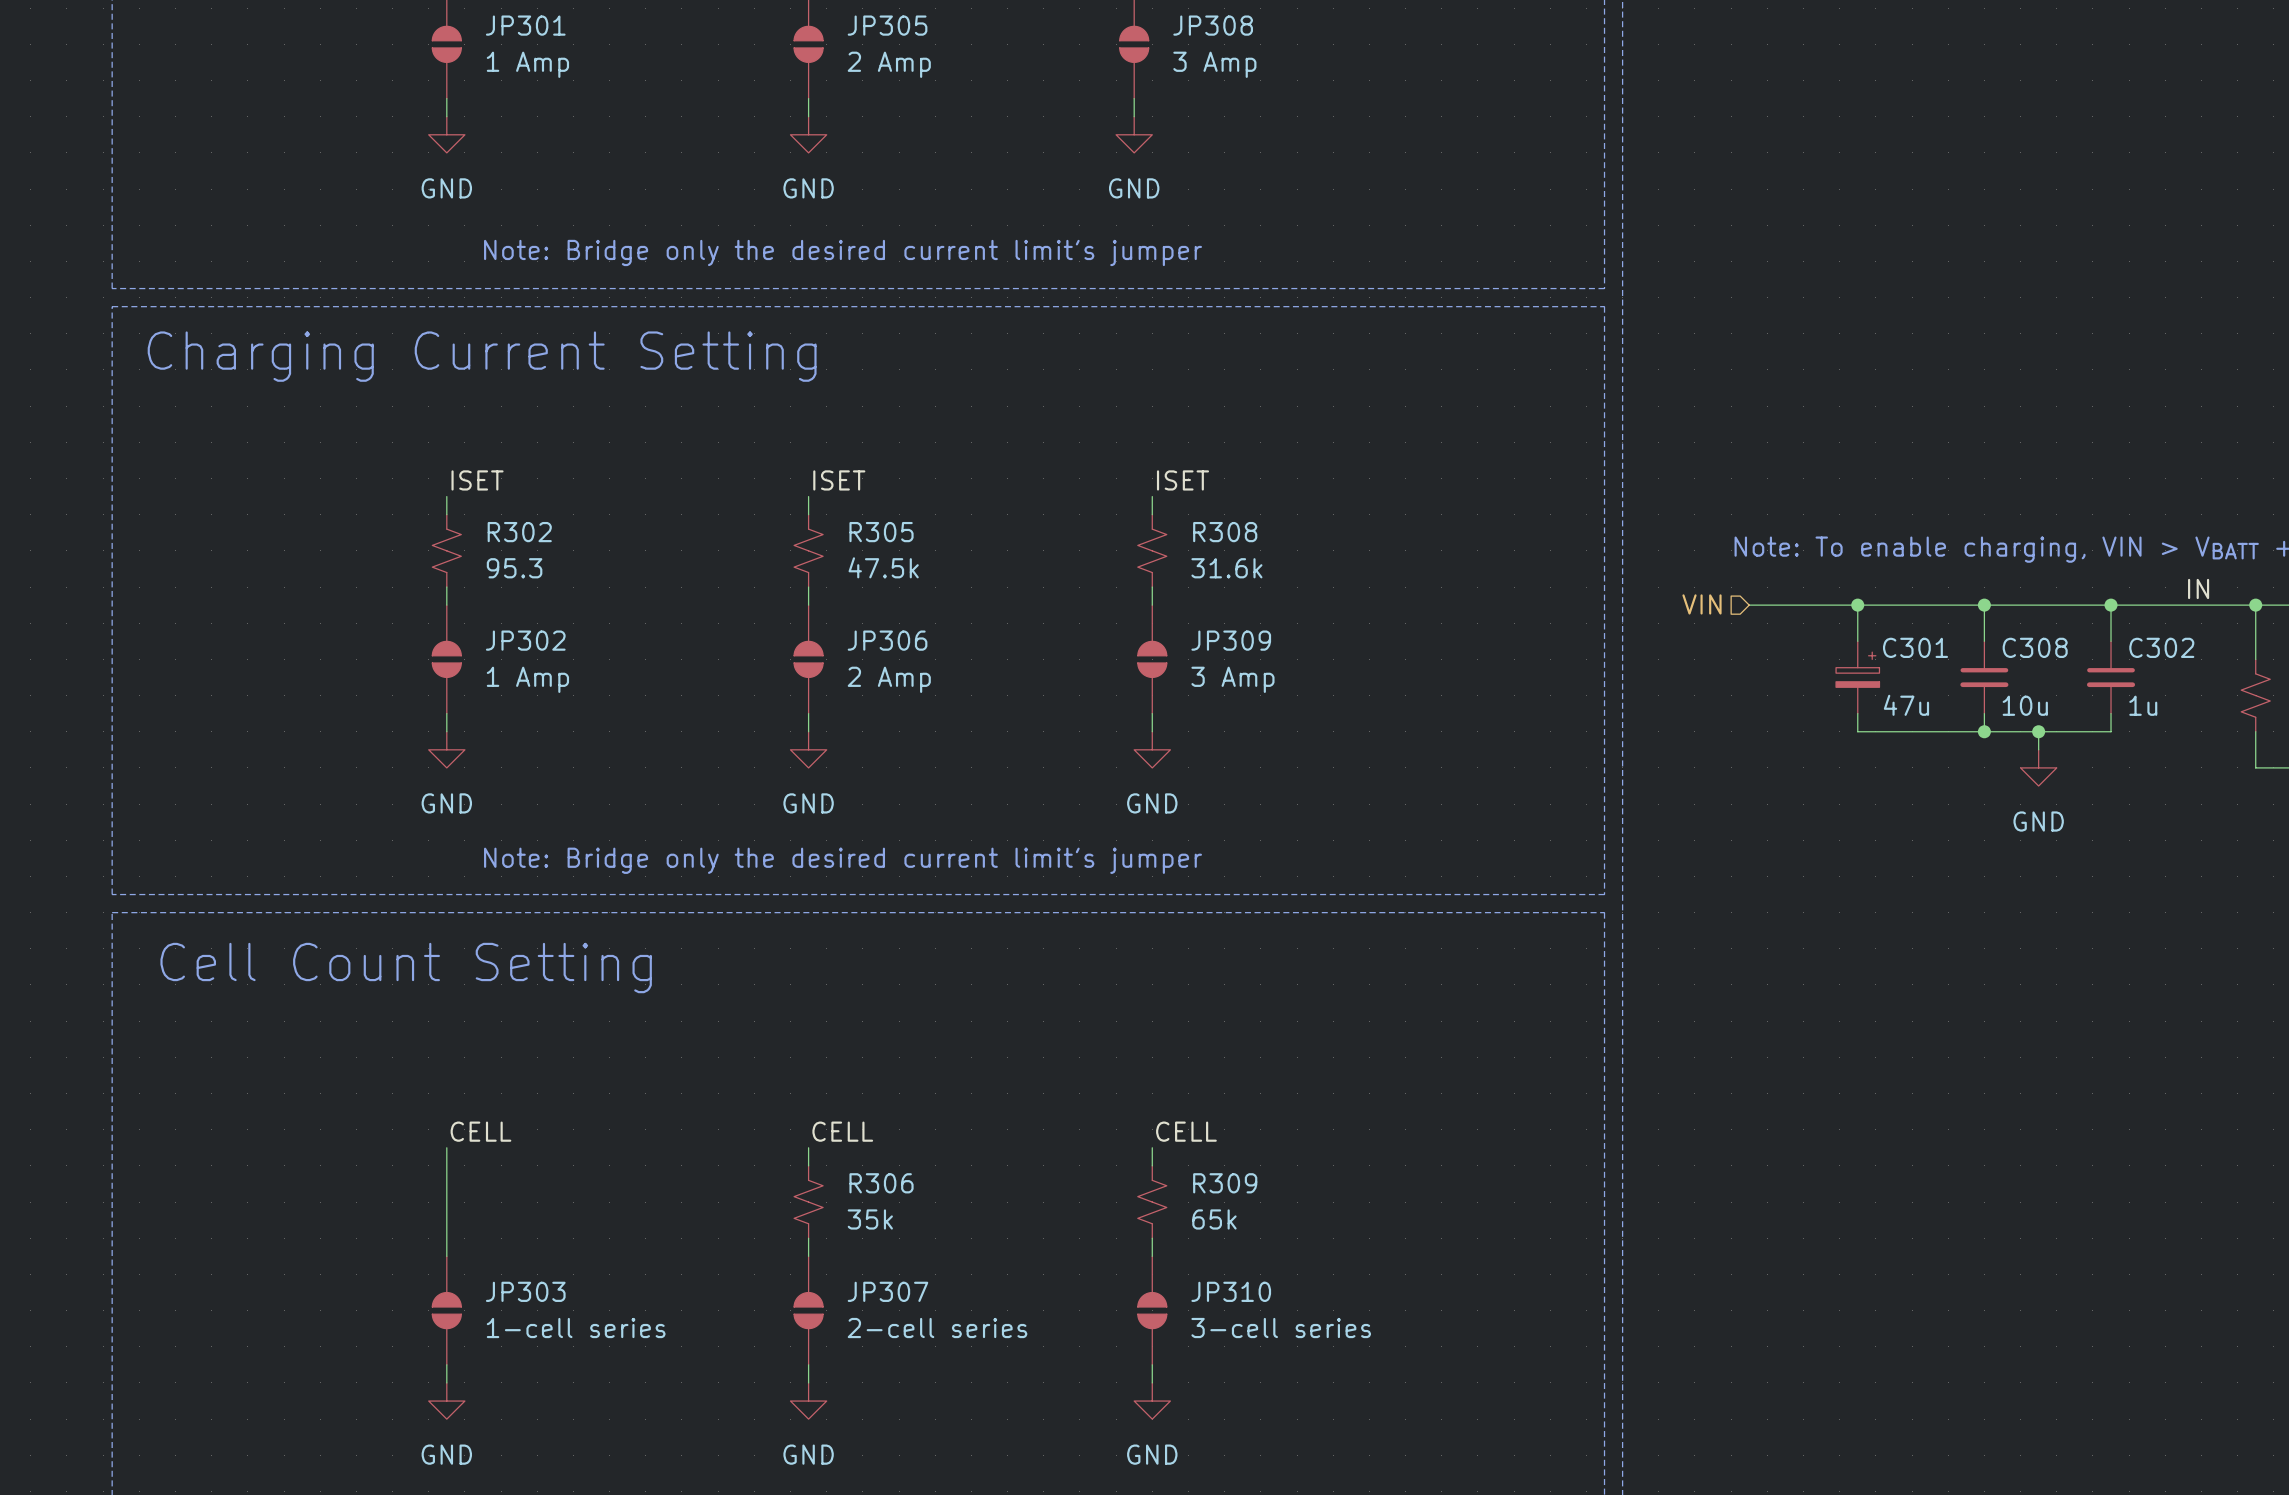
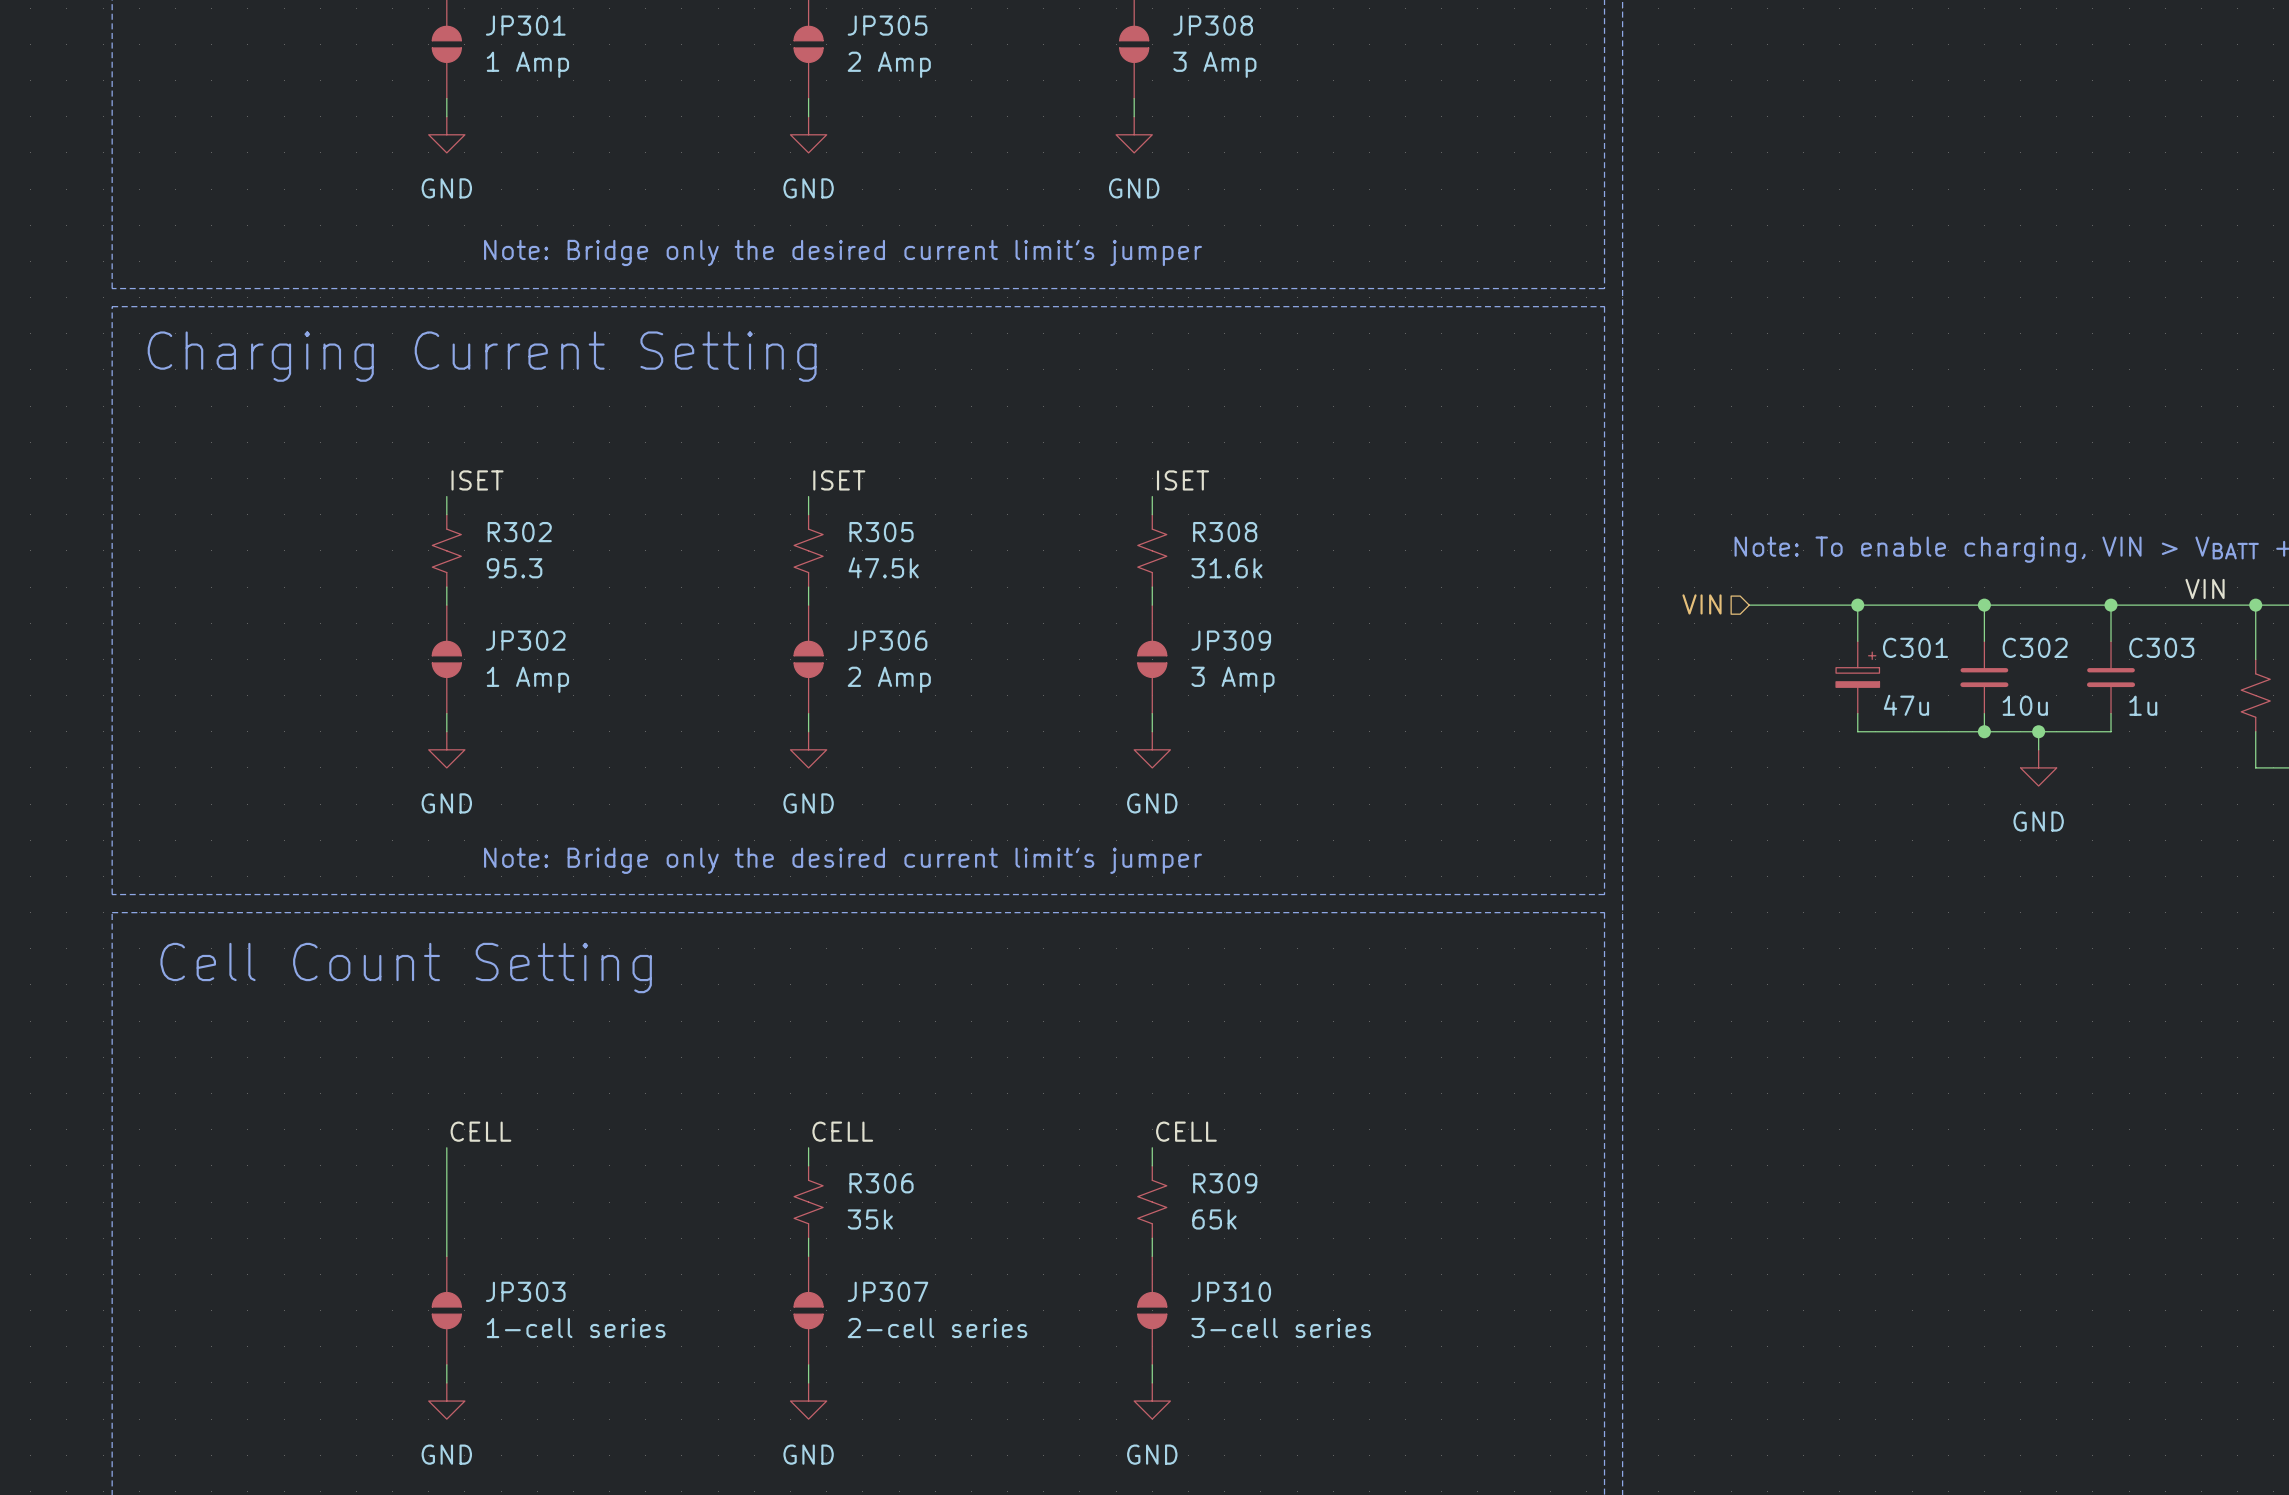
label: IN (2198, 588) -> VIN (2205, 588)
C308 name: C308 (2035, 647) -> C302 (2035, 647)
C302 name: C302 (2161, 647) -> C303 (2161, 647)

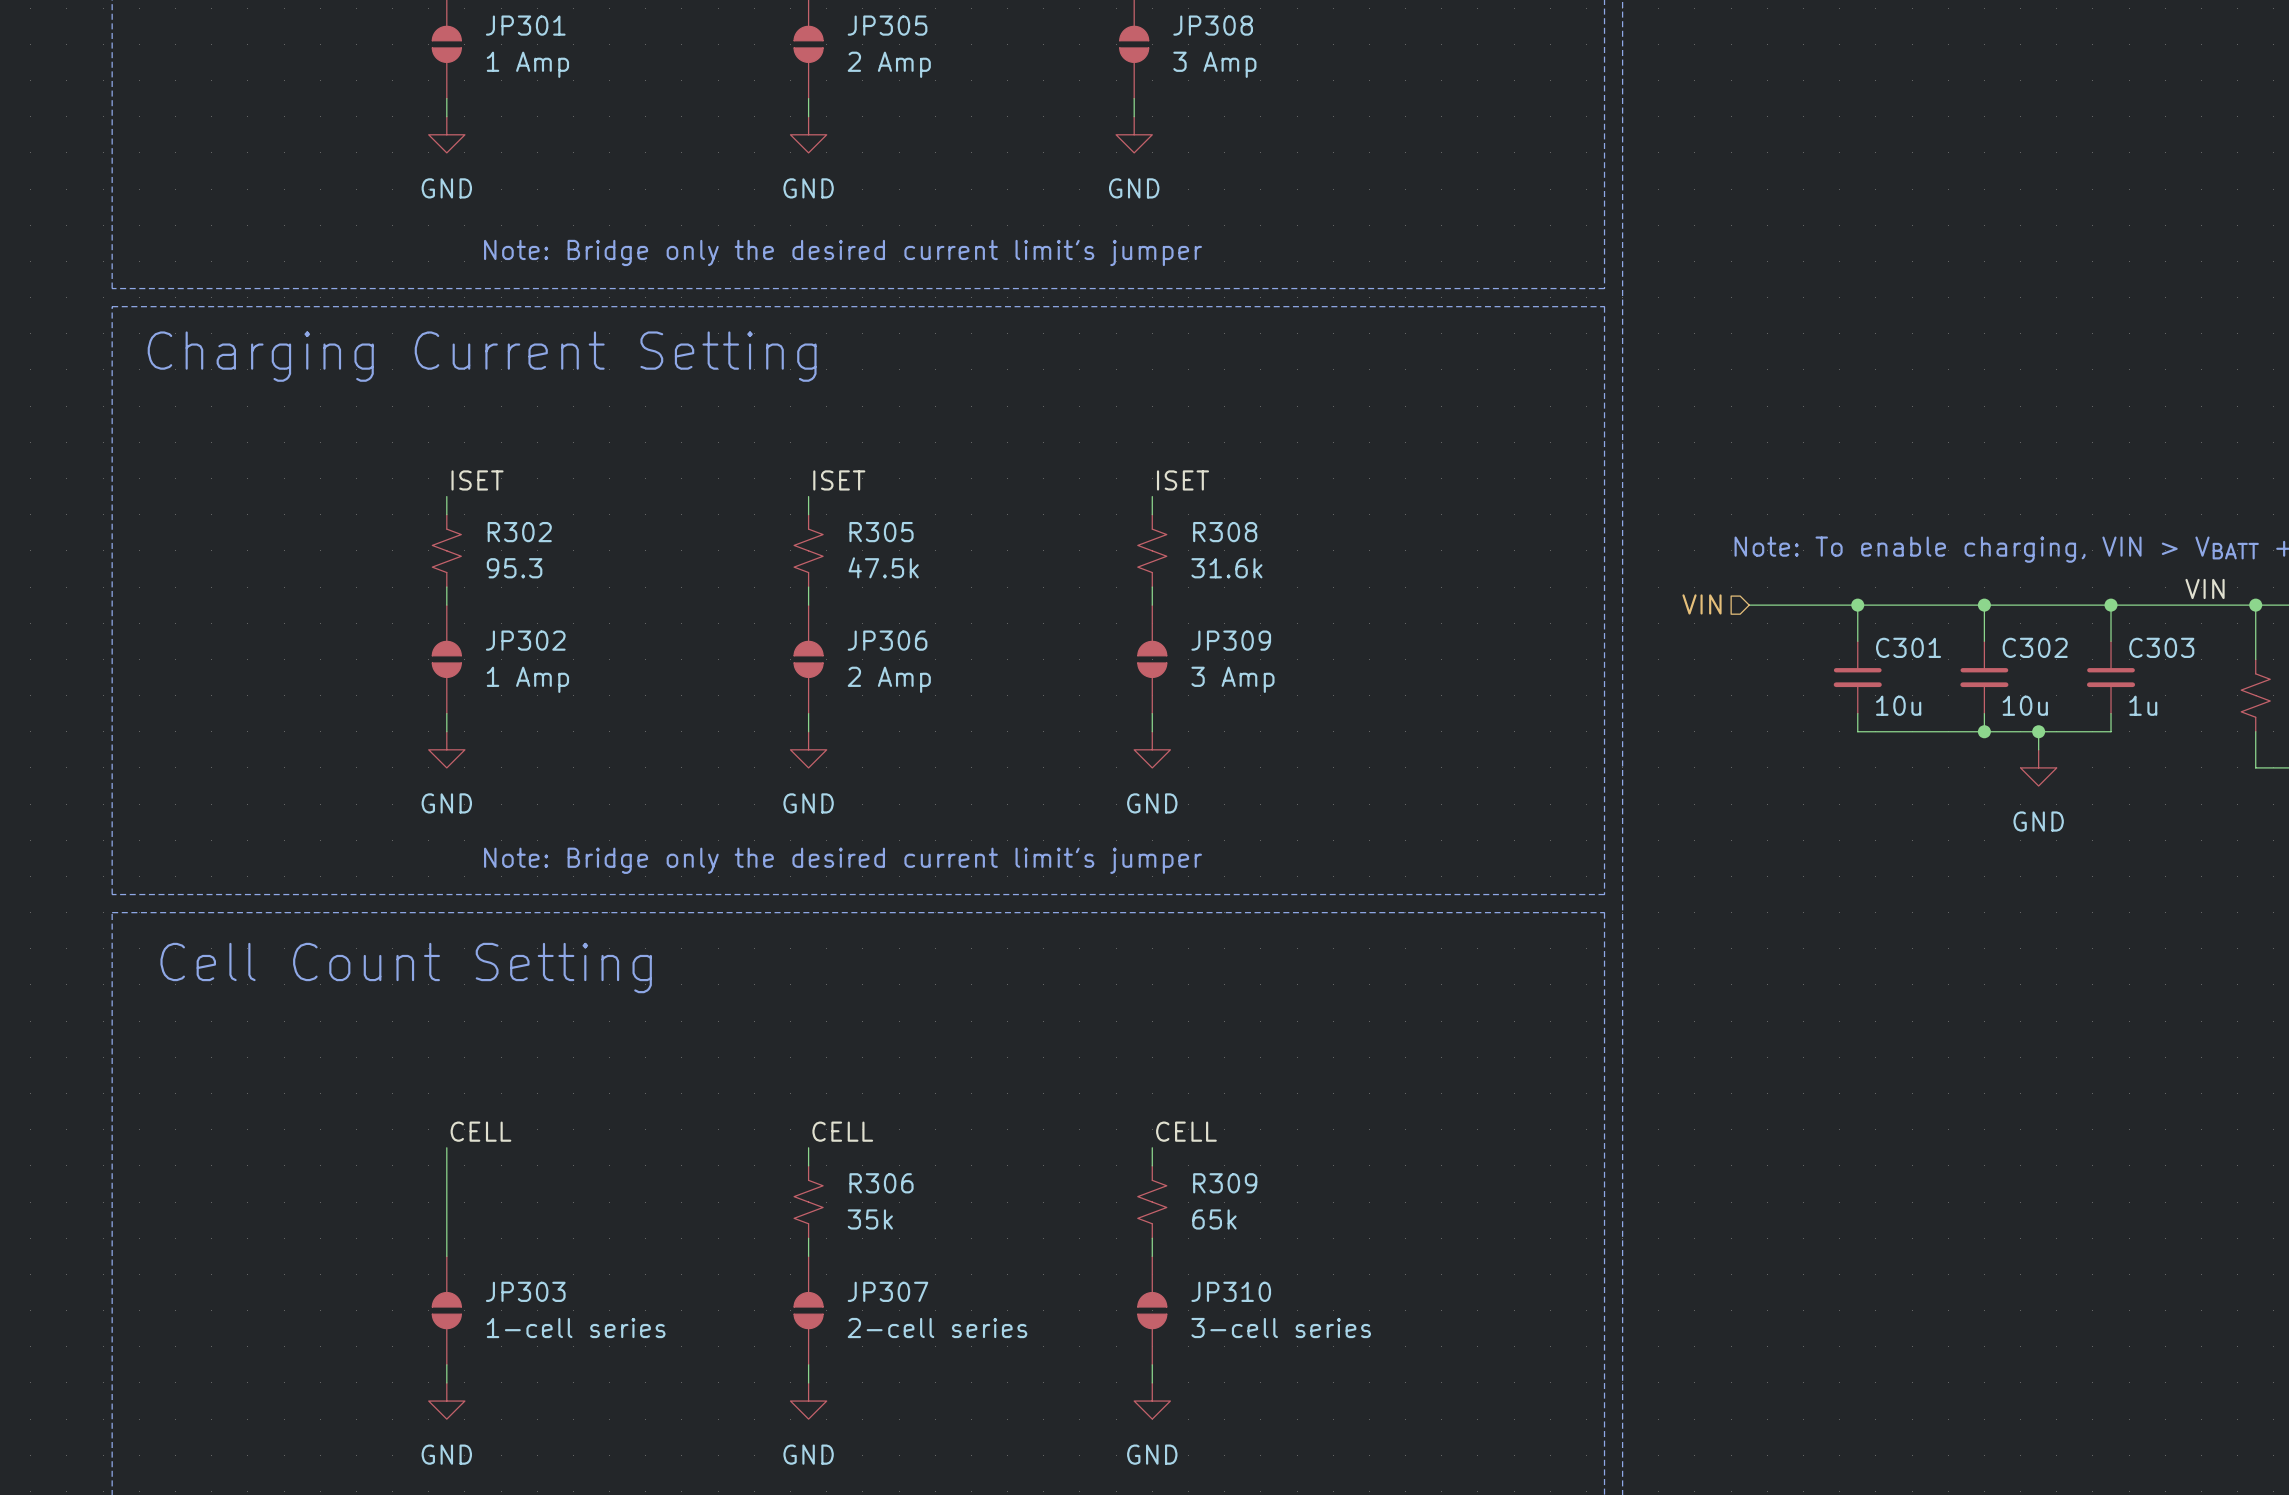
C301 symbol: [1836, 641, 1880, 714] -> [1833, 641, 1882, 714]
C301 value: 47u (1906, 705) -> 10u (1898, 705)

